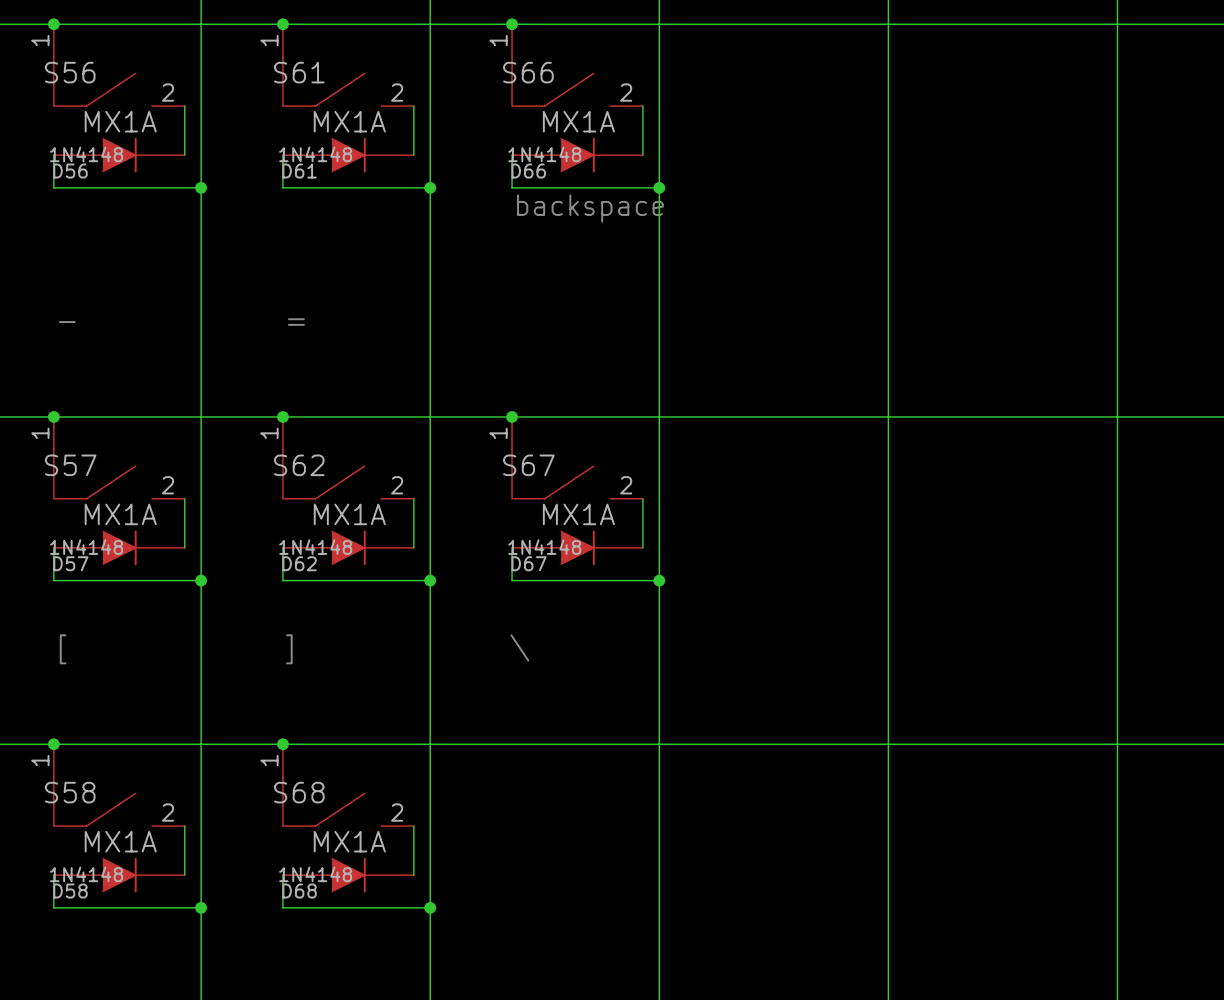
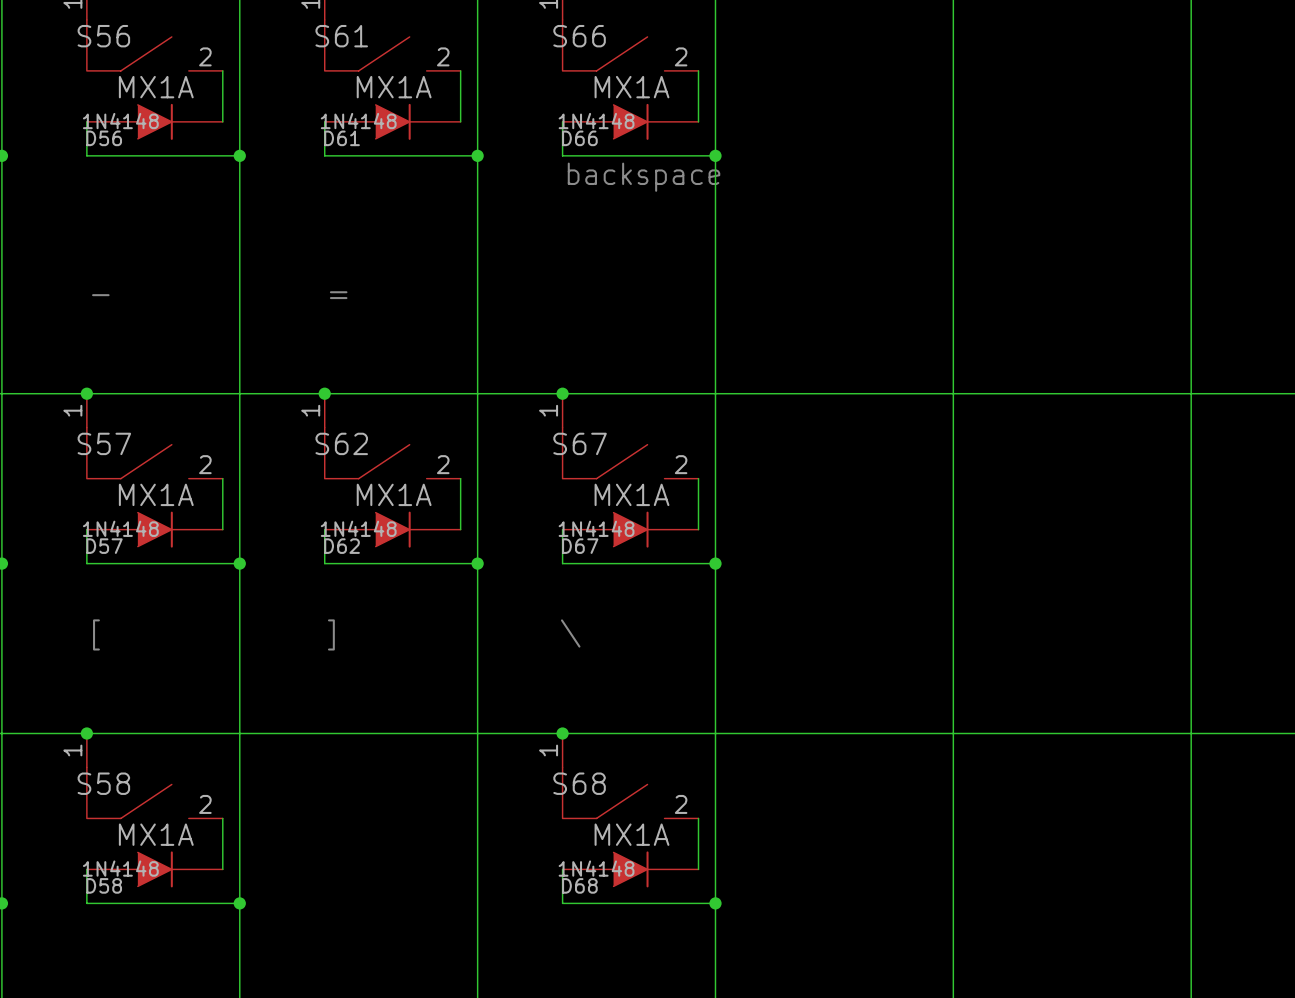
junction: (282, 744) -> none
junction: none -> (562, 733)
S68 position: (348, 785) -> (630, 775)
wire: (413, 826) (413, 875) -> (698, 818) (698, 869)
wire: (282, 875) (282, 907) (430, 907) -> (562, 869) (562, 903) (715, 903)
D68 position: (348, 875) -> (630, 869)
junction: (430, 907) -> none
junction: none -> (715, 903)

